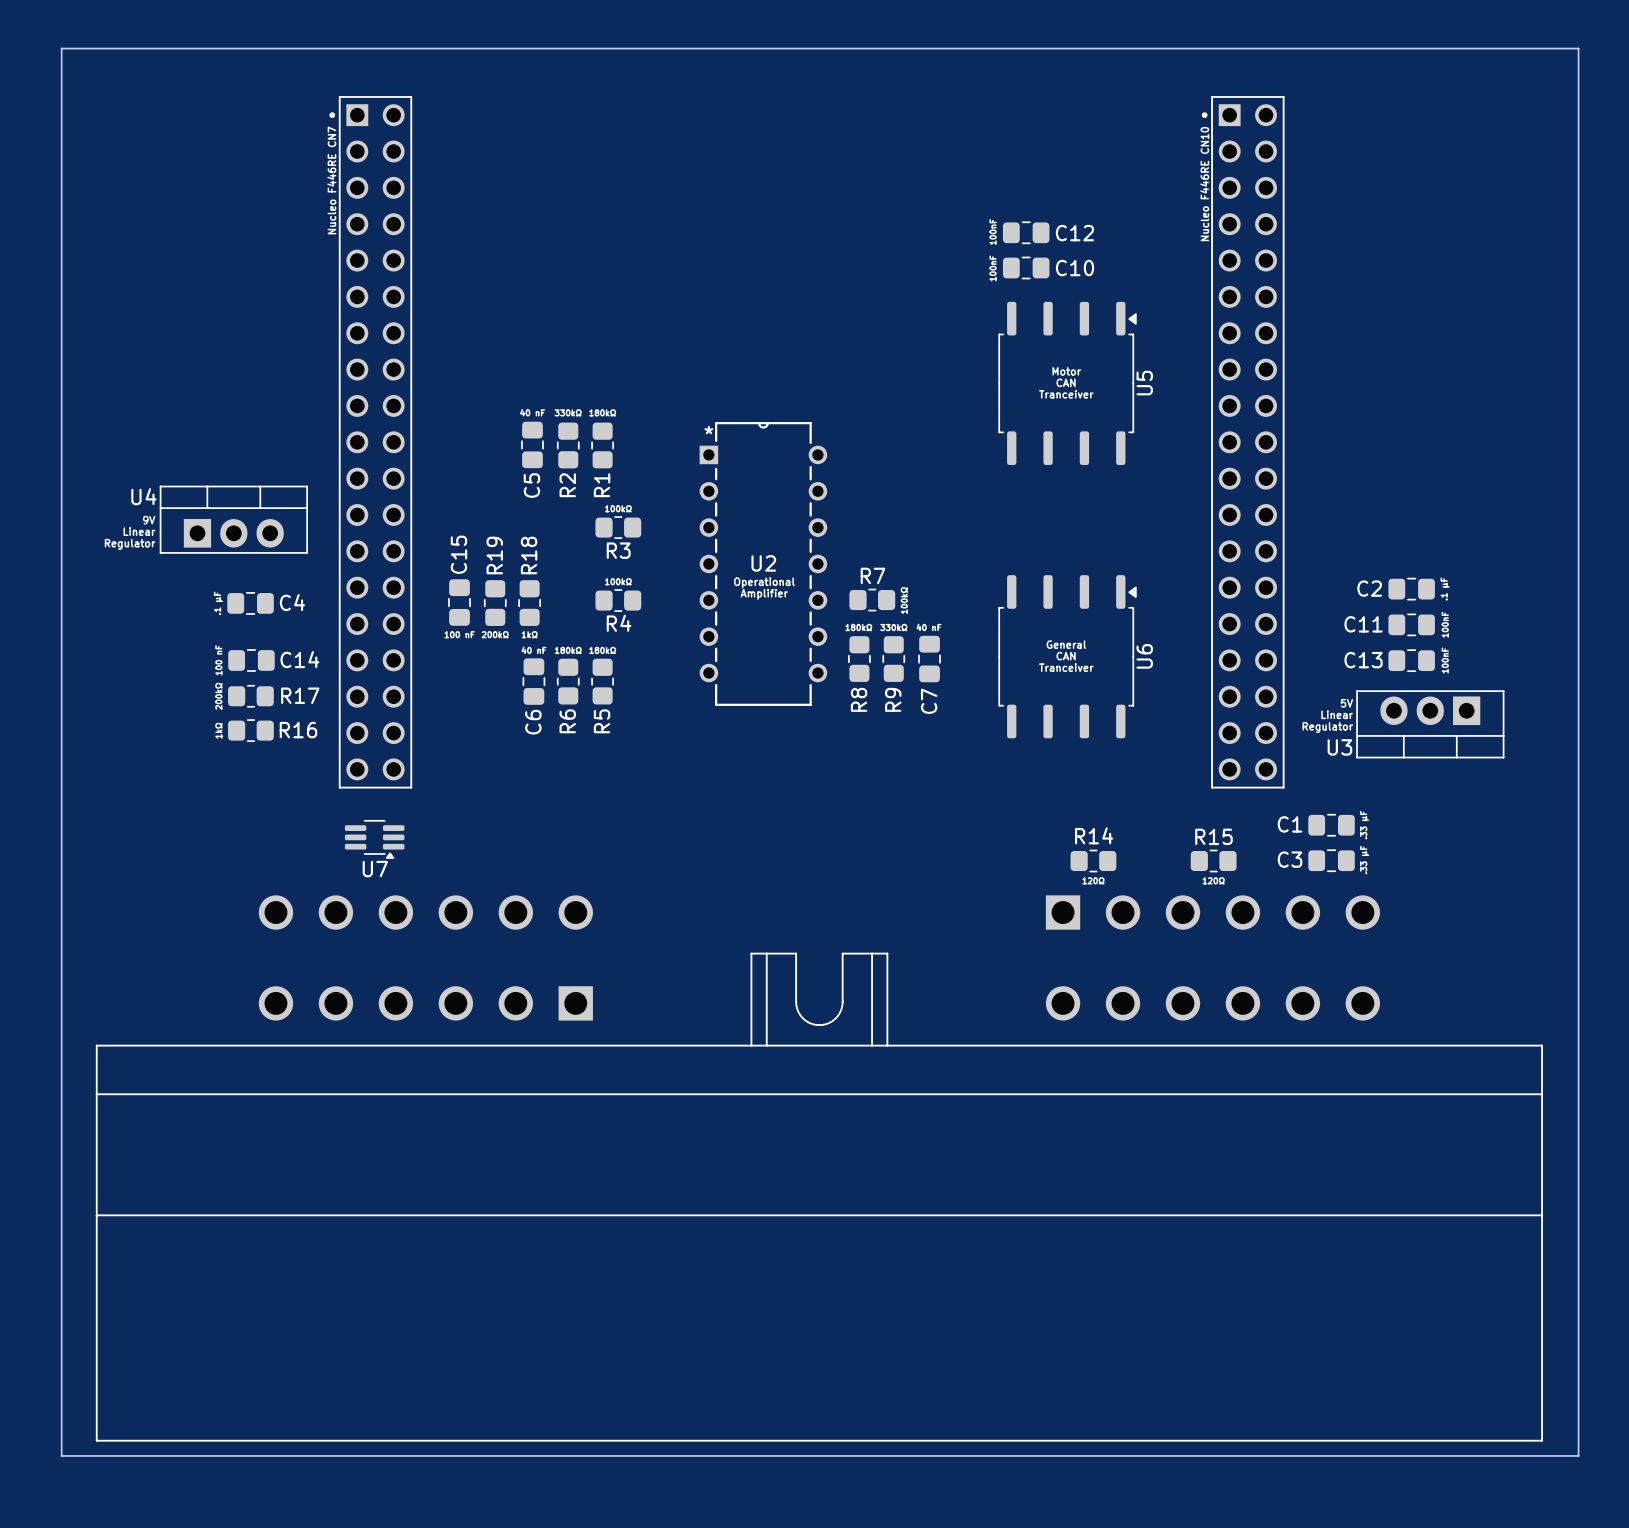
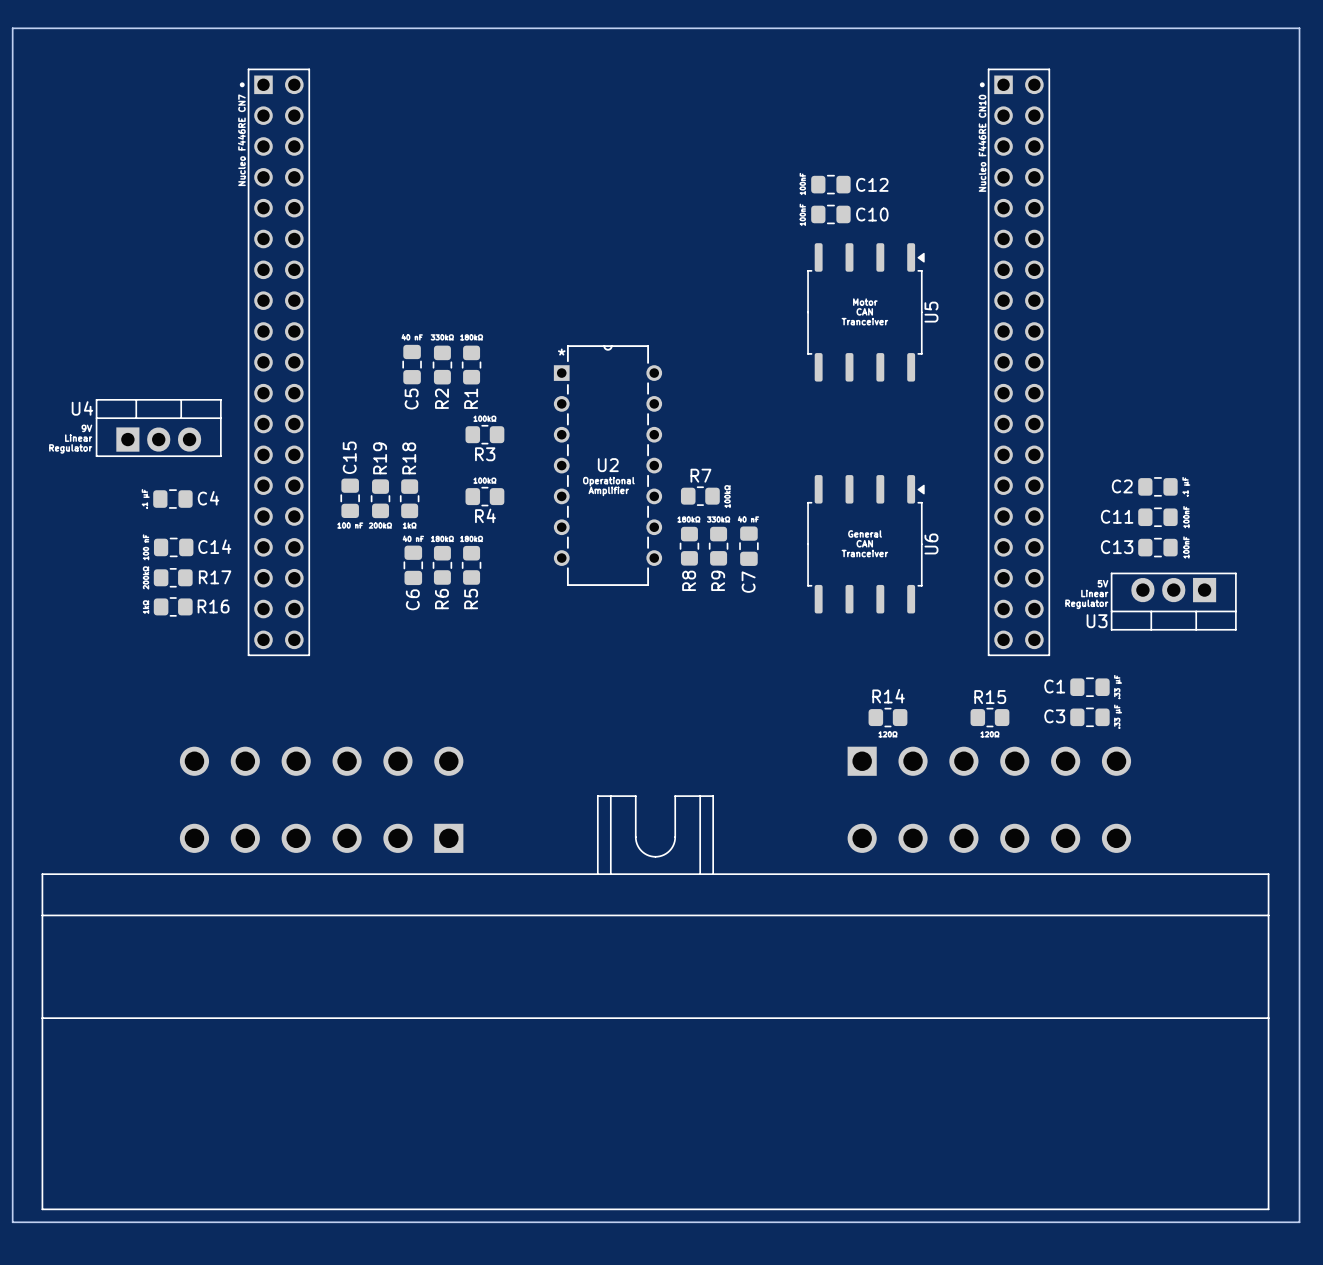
U7: (374, 839) -> none

